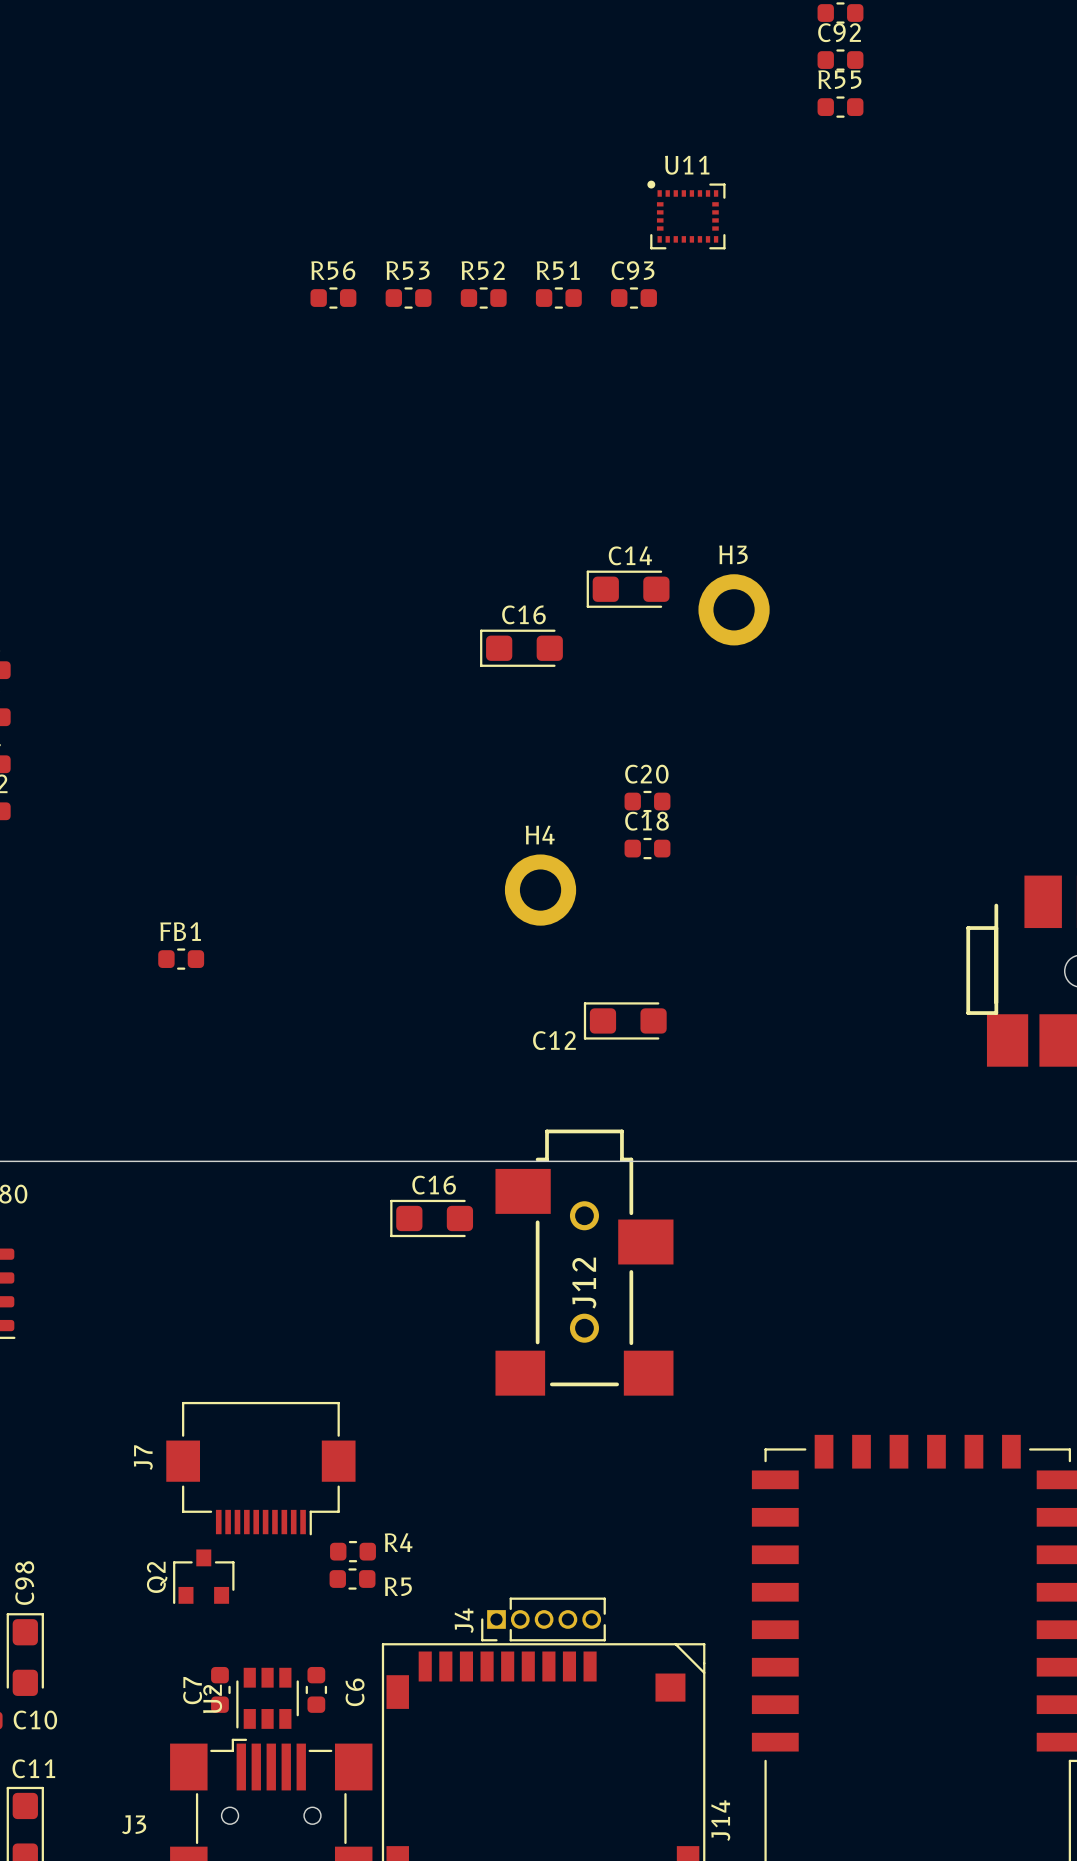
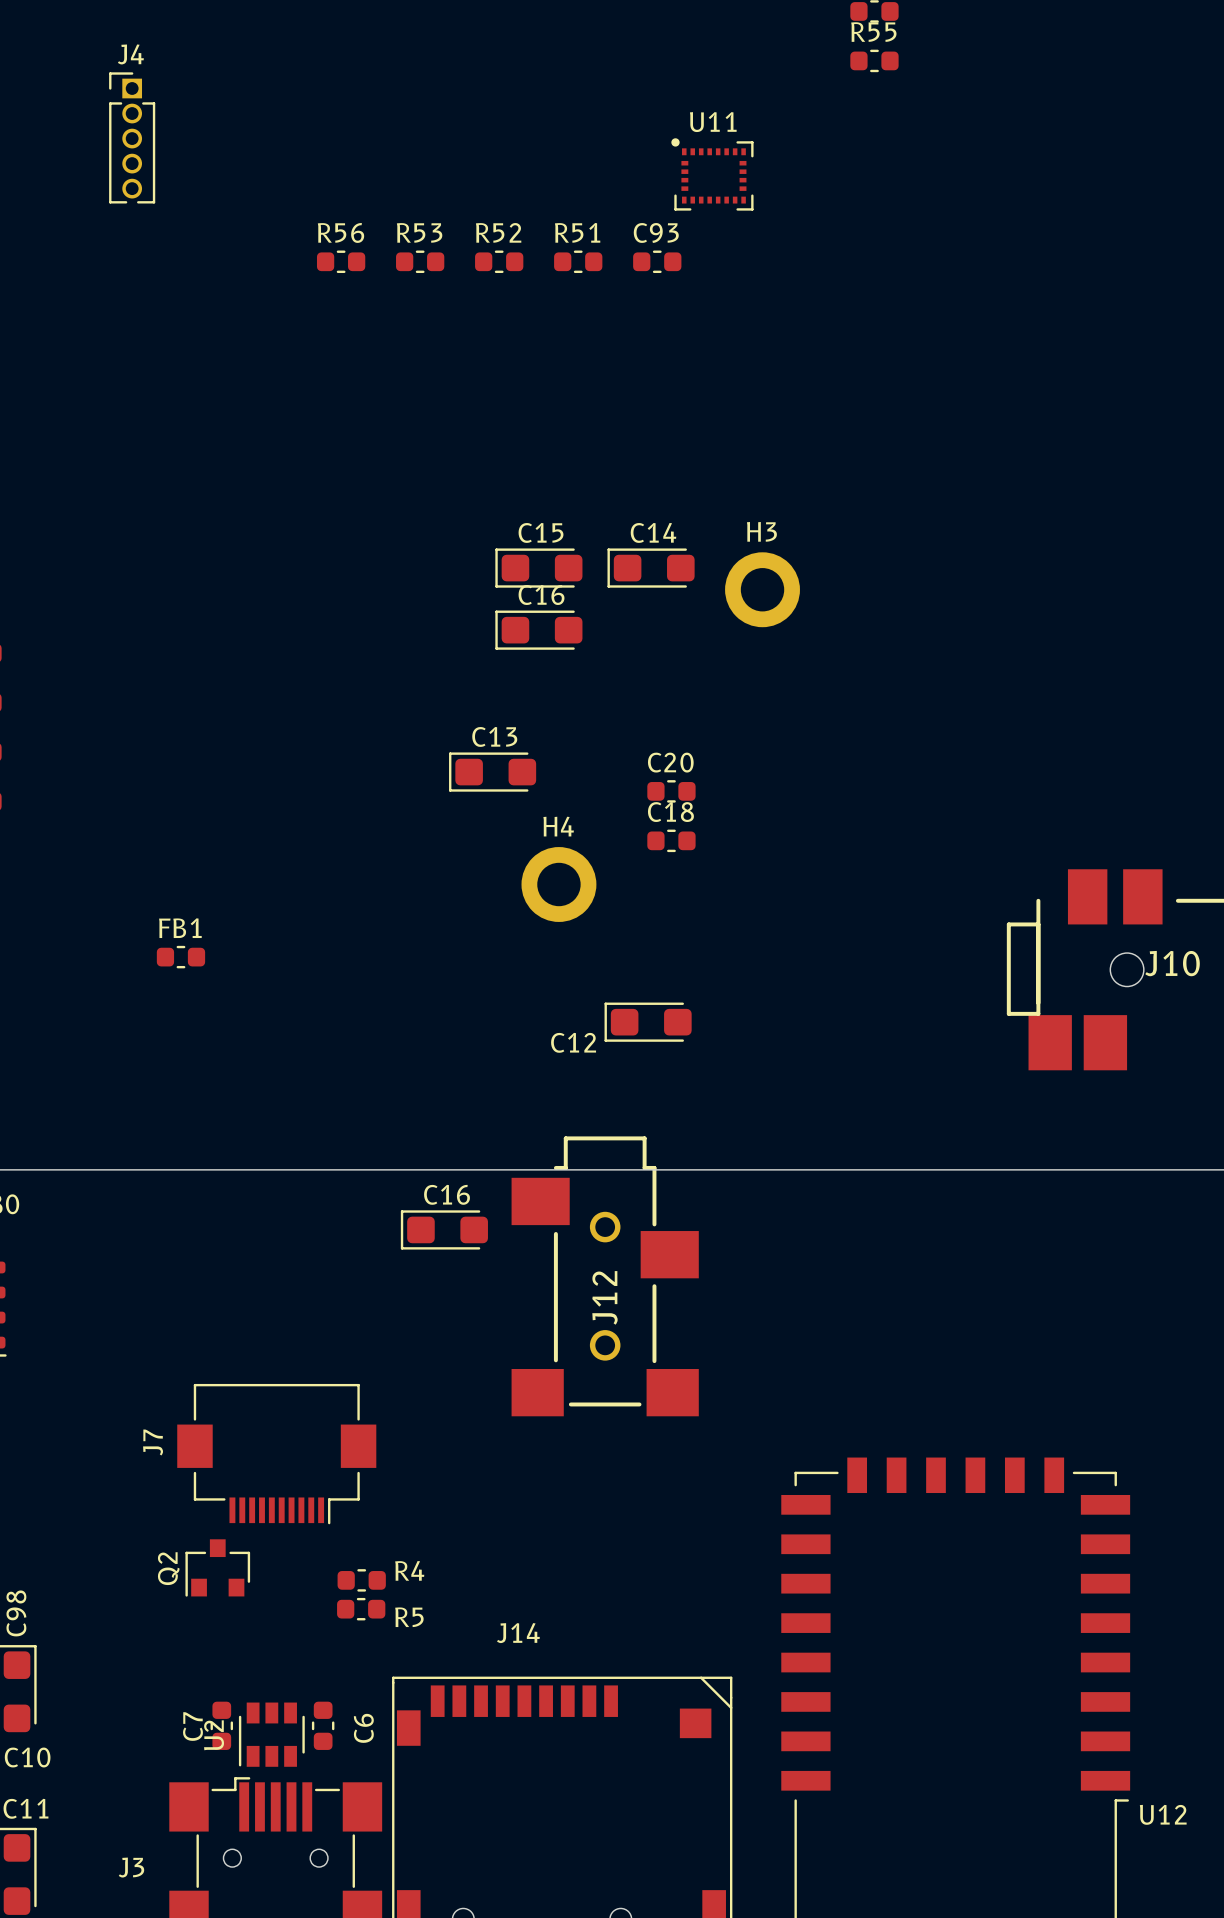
C15: none -> (538, 568)
C13: none -> (492, 772)
J7 position: (260, 1468) -> (276, 1454)
Q2 position: (203, 1576) -> (217, 1567)
J4 rotation: 0° (543, 1619) -> 90° clockwise (132, 137)
J4 position: (543, 1619) -> (132, 137)
J14 name rotation: 0° (720, 1820) -> 90° clockwise (518, 1633)
J14 name position: J14 (720, 1820) -> J14 (518, 1633)

